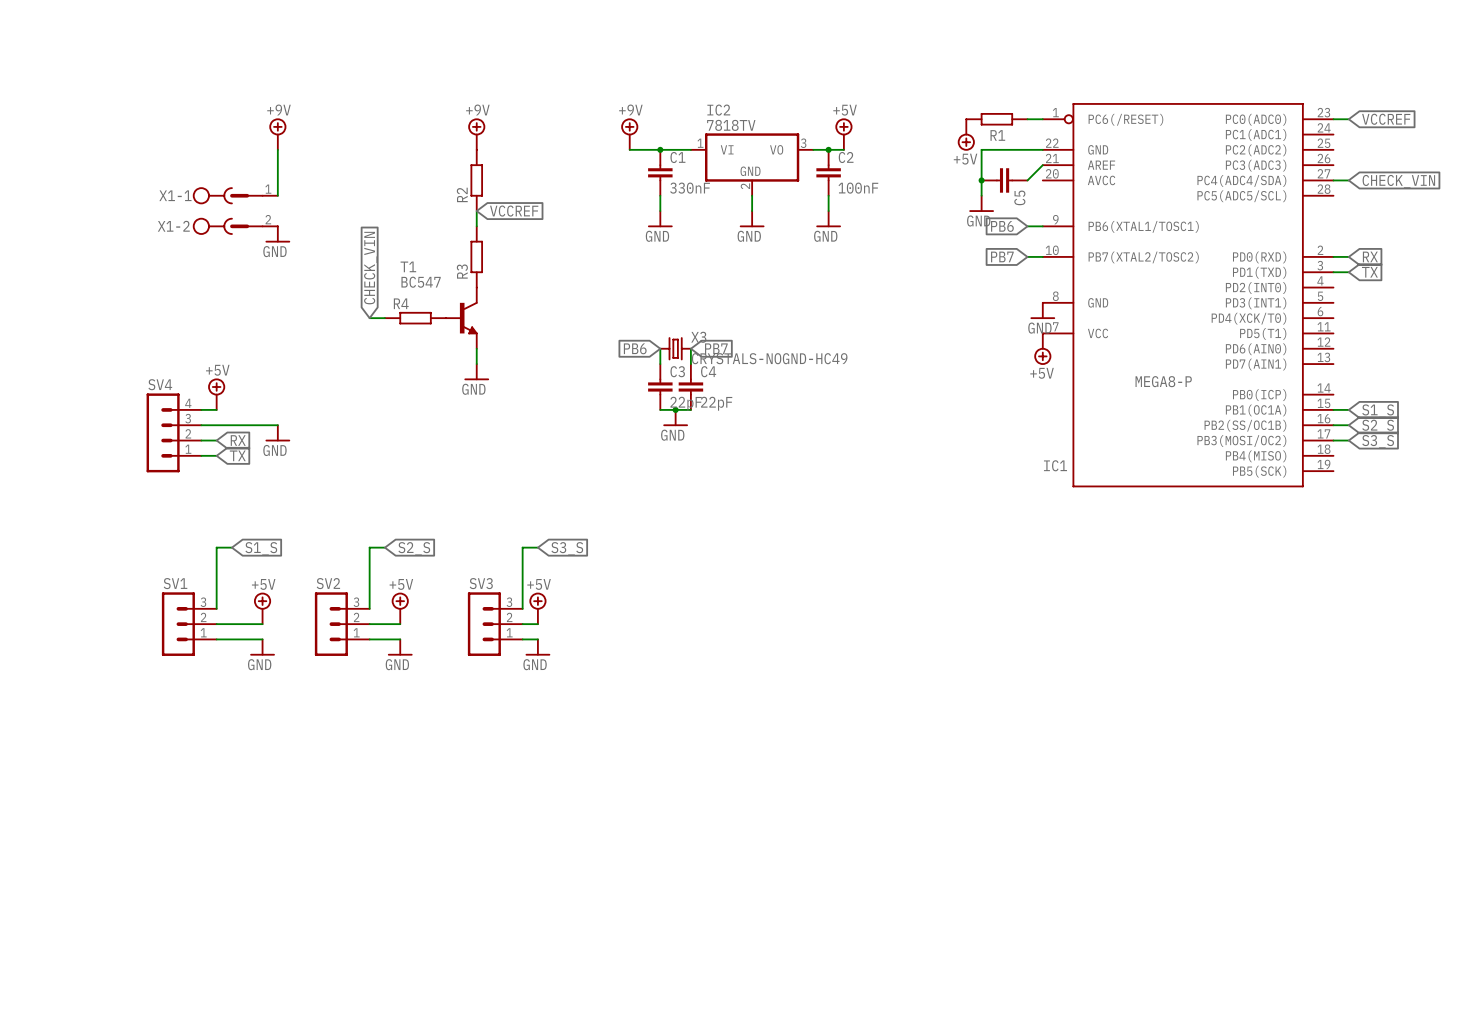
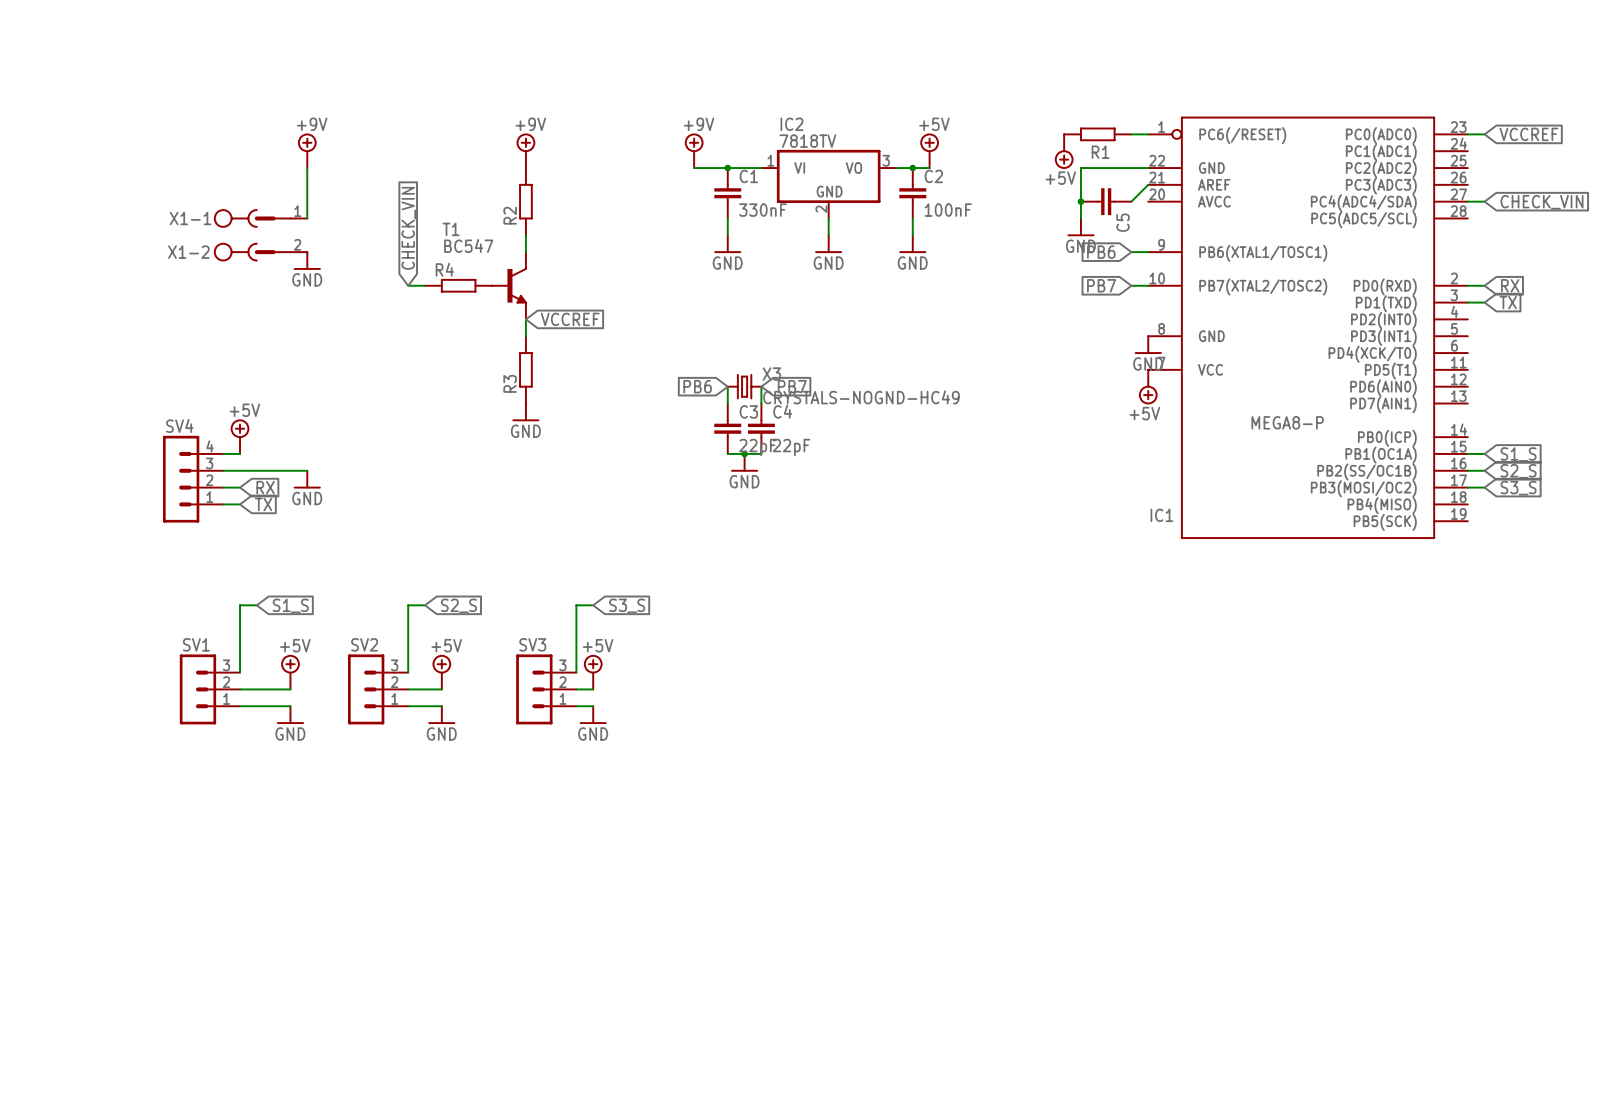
global label position: VCCREF (514, 211) -> VCCREF (570, 319)
R3 position: (476, 256) -> (525, 369)
global label position: CHECK_VIN (370, 268) -> CHECK_VIN (408, 228)
wire: (369, 318) (384, 318) -> (408, 285) (425, 285)
R4 position: (415, 318) -> (458, 285)
T1 position: (461, 318) -> (509, 285)

